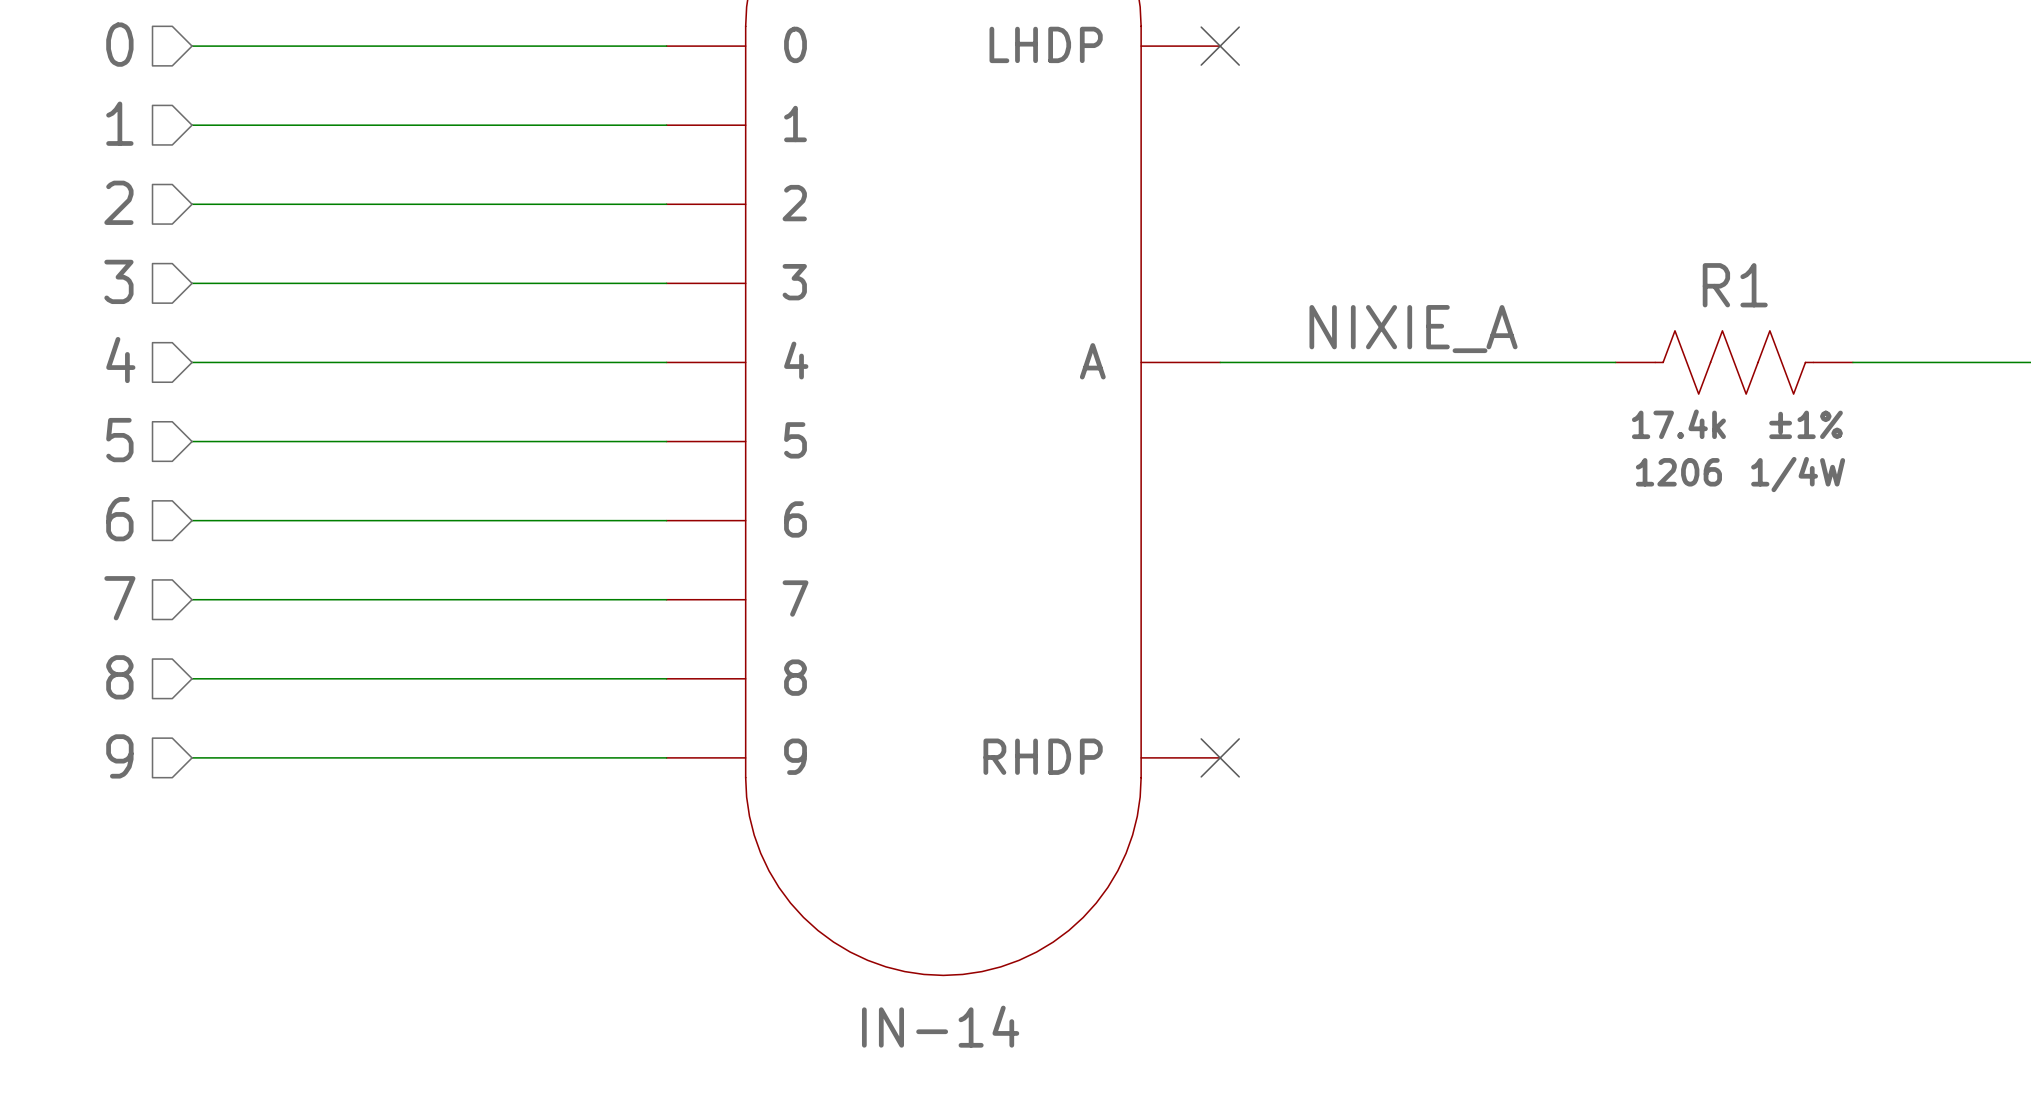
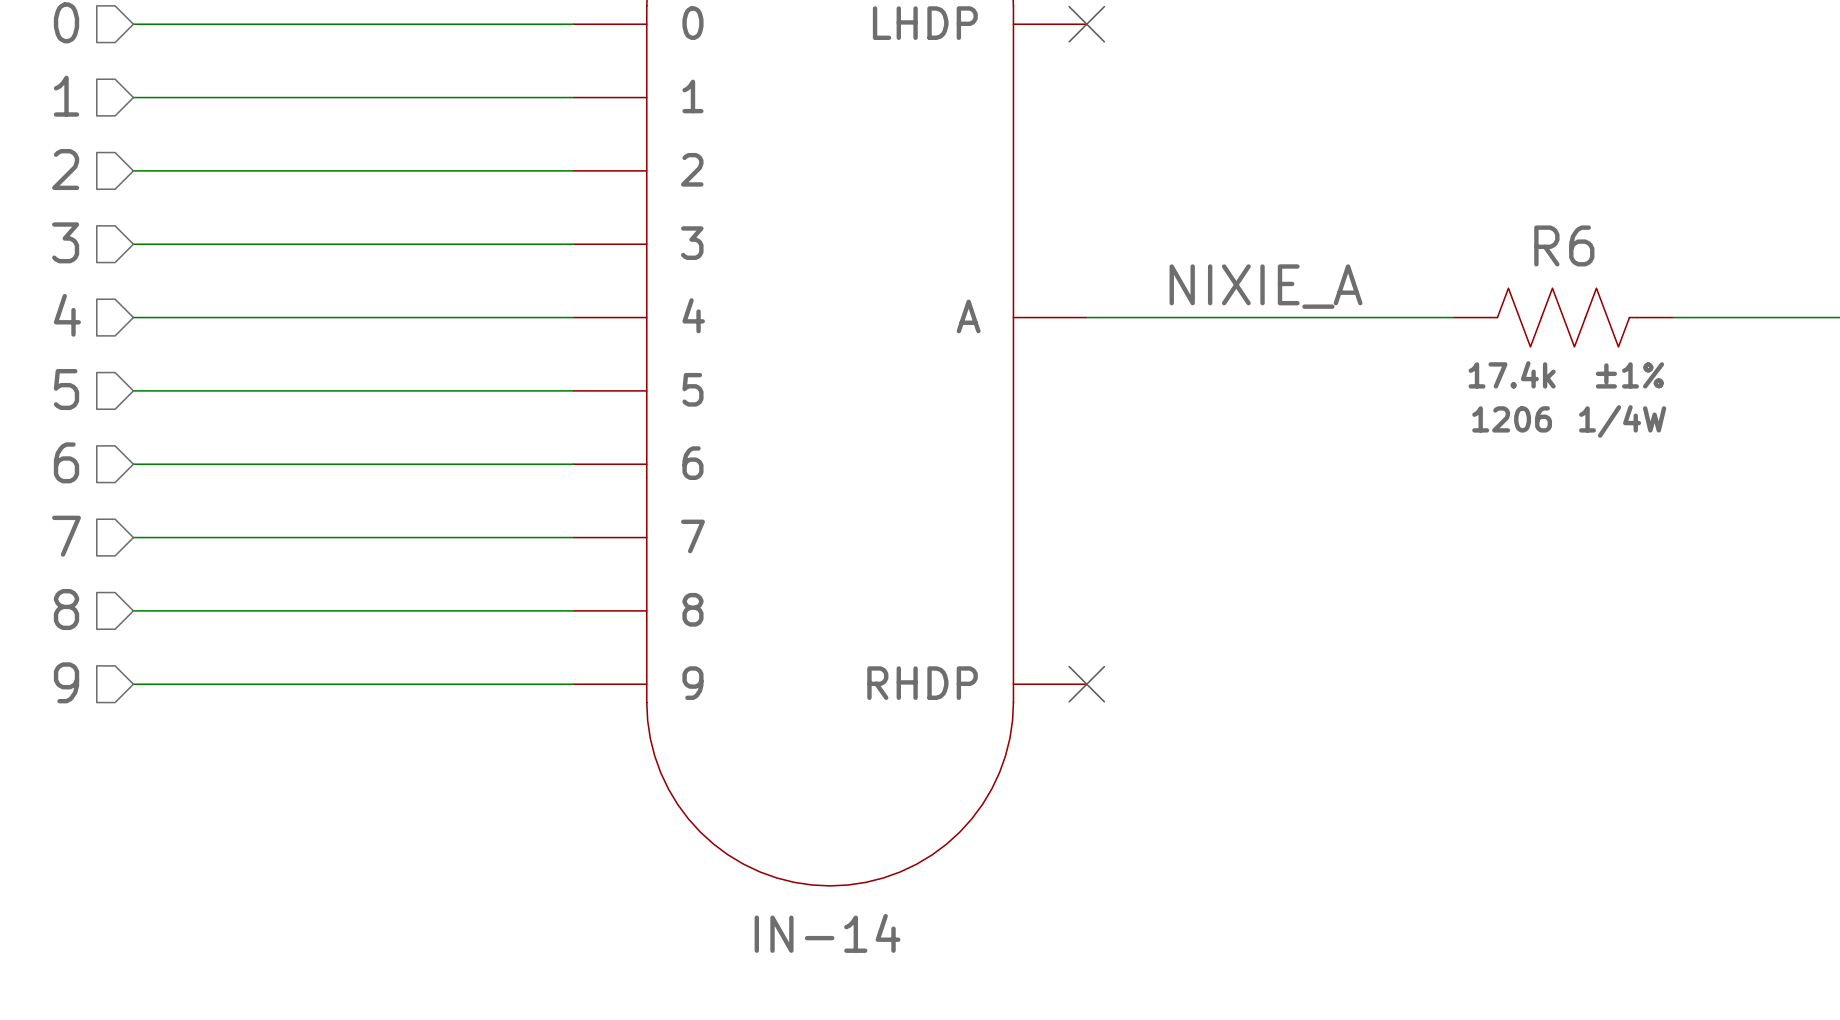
R1 name: R1 (1735, 285) -> R6 (1564, 245)

